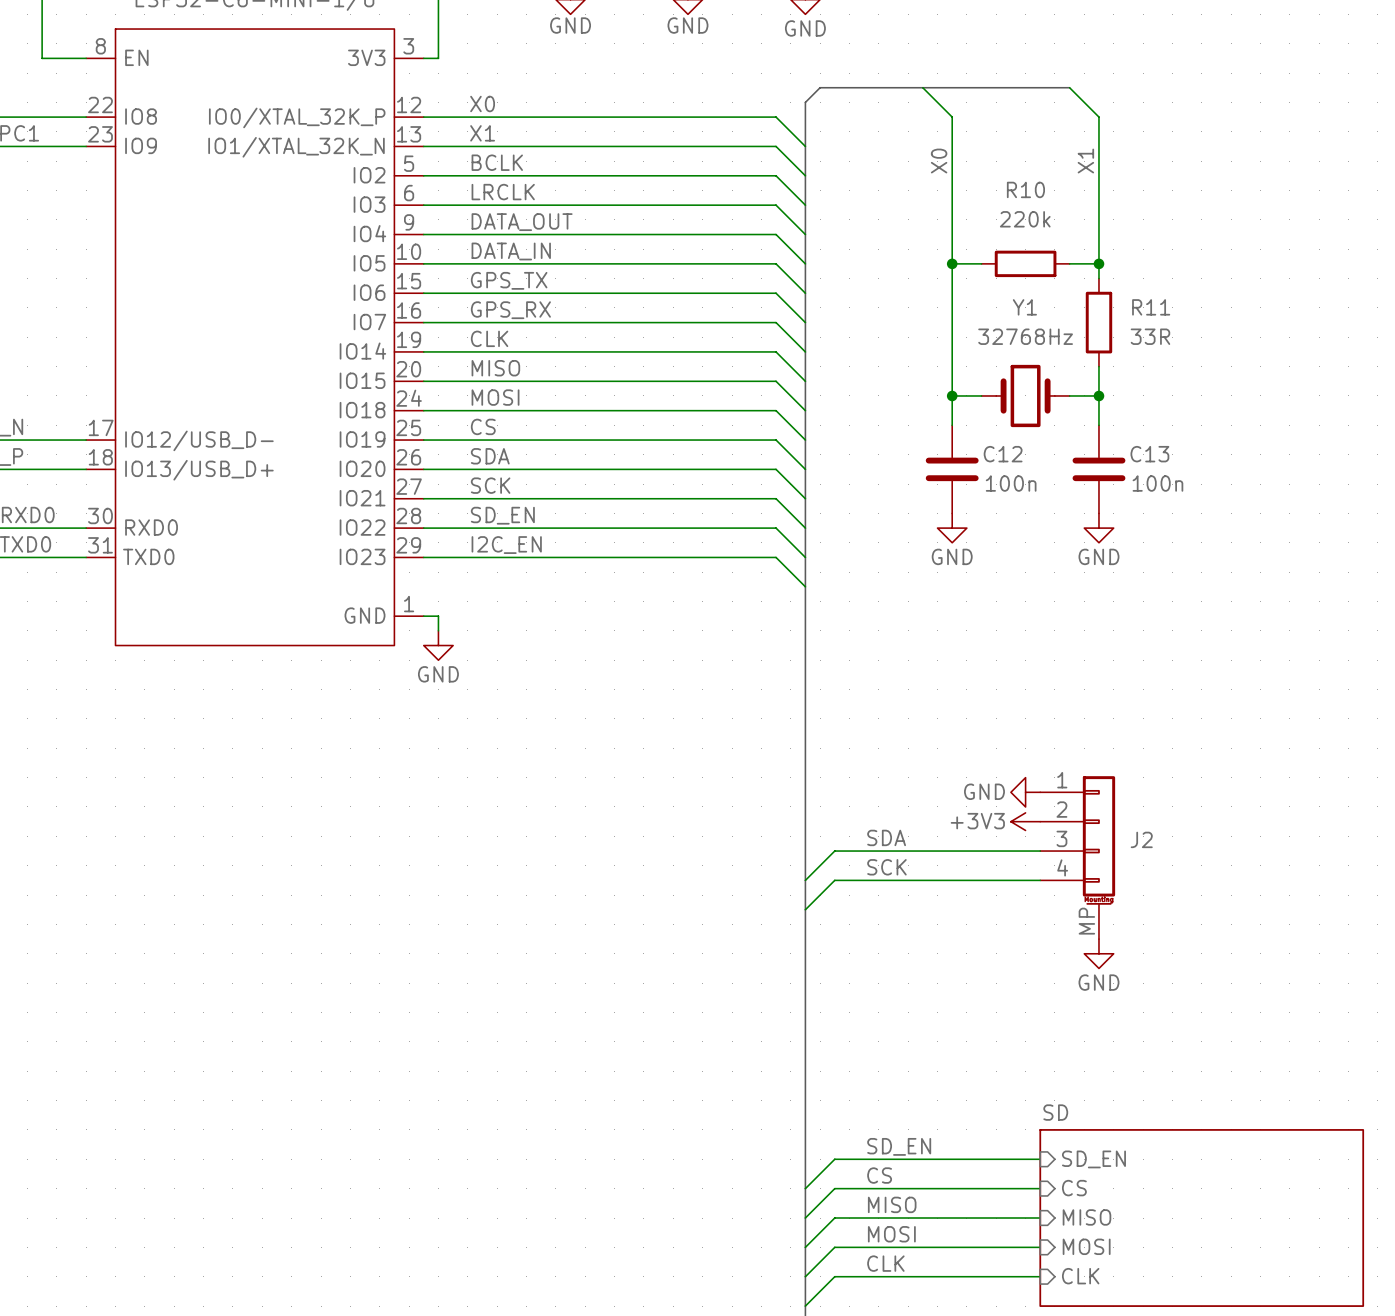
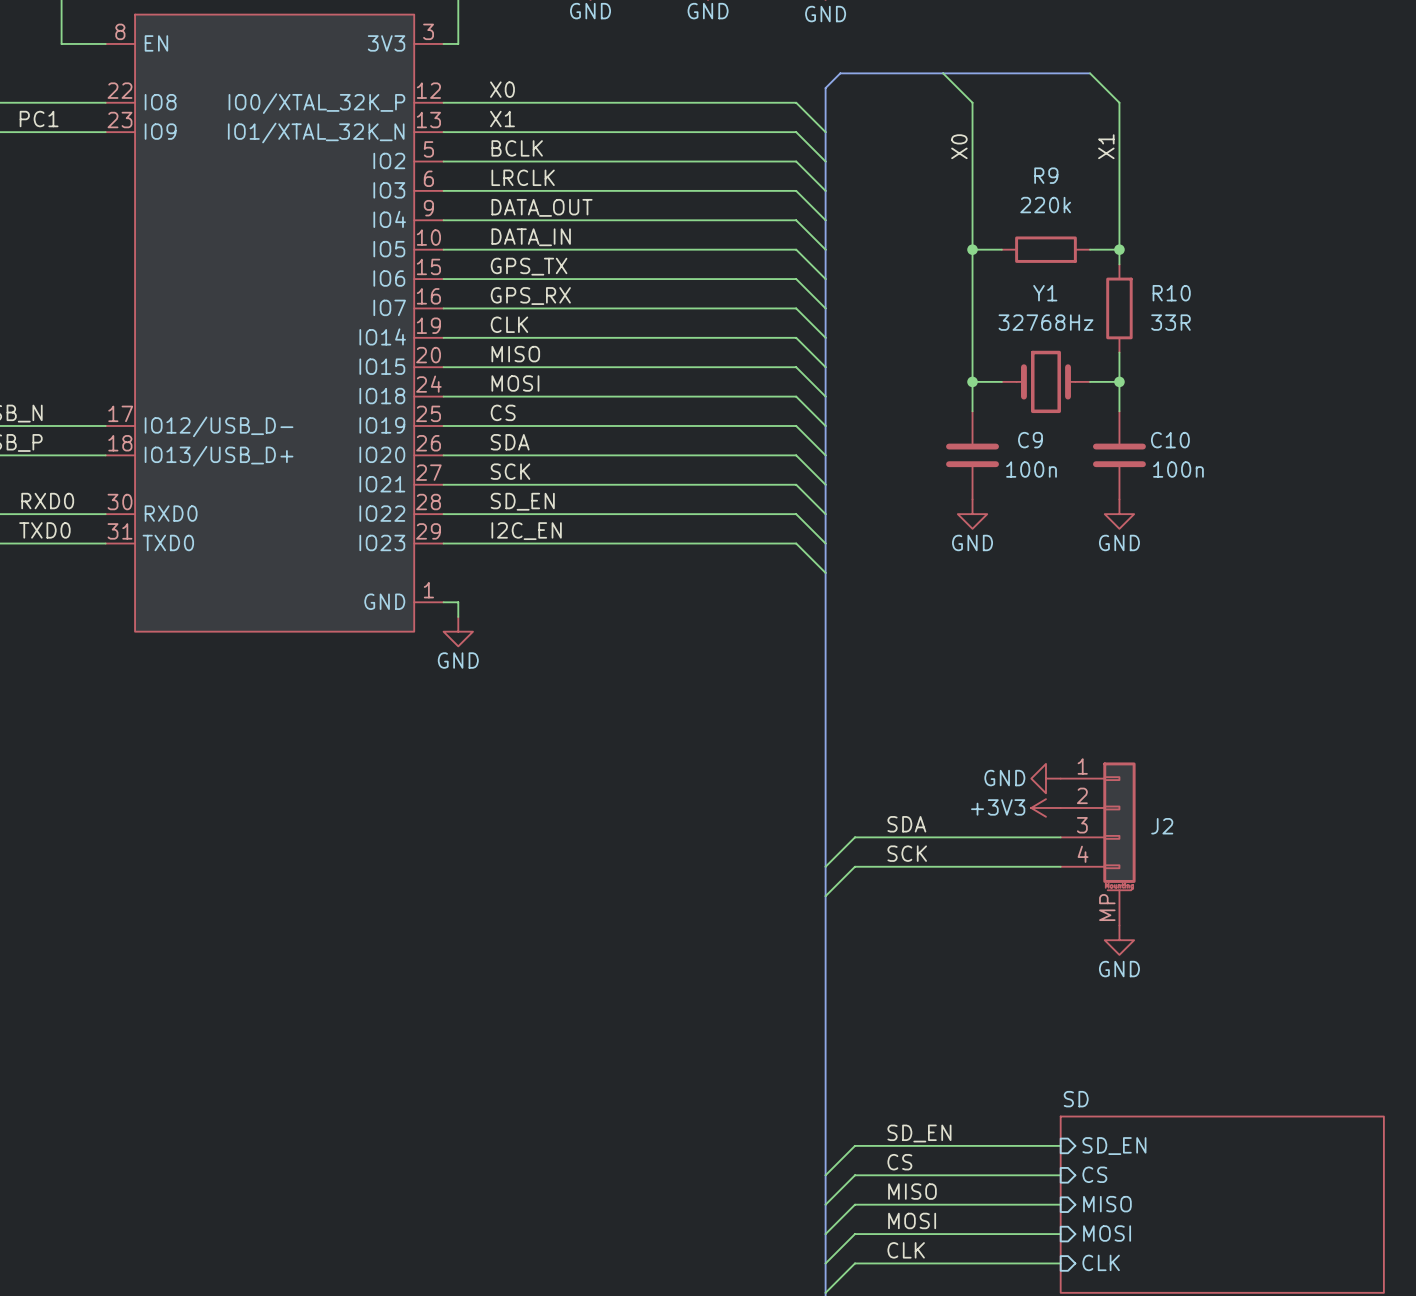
R10 name: R10 (1025, 189) -> R9 (1046, 175)
R11 name: R11 (1151, 307) -> R10 (1171, 293)
C12 name: C12 (1003, 454) -> C9 (1030, 440)
C13 name: C13 (1149, 454) -> C10 (1170, 440)

